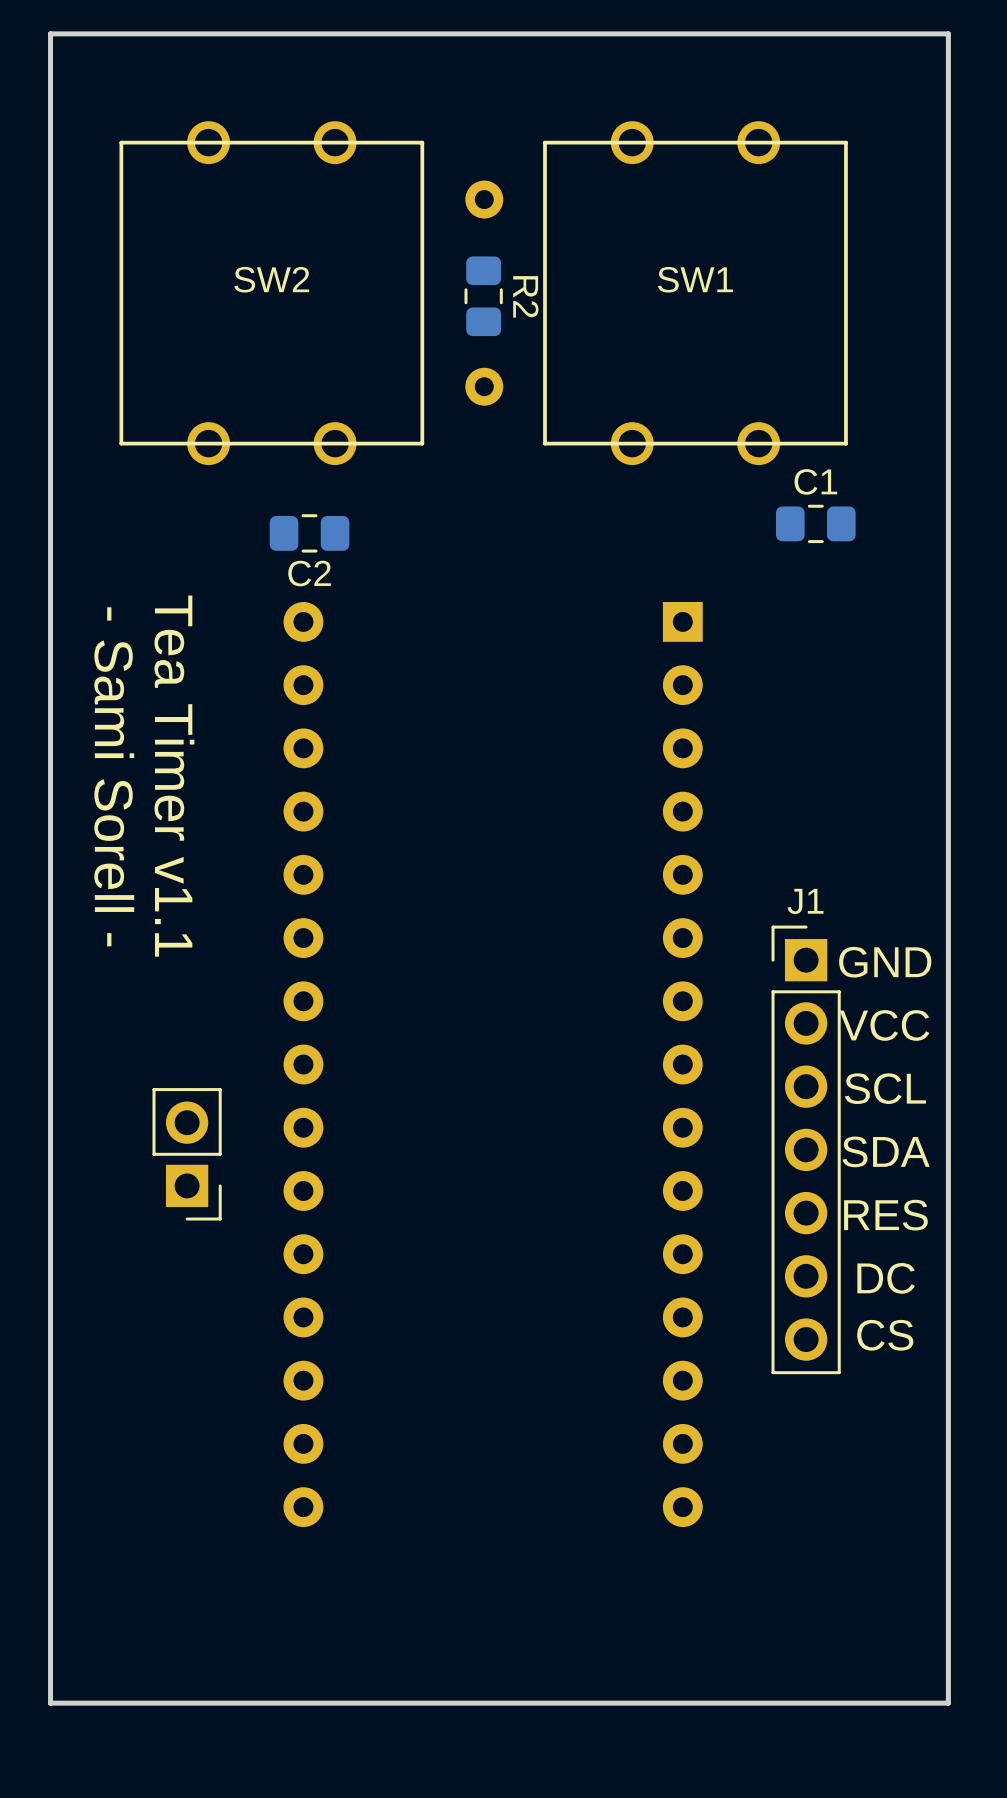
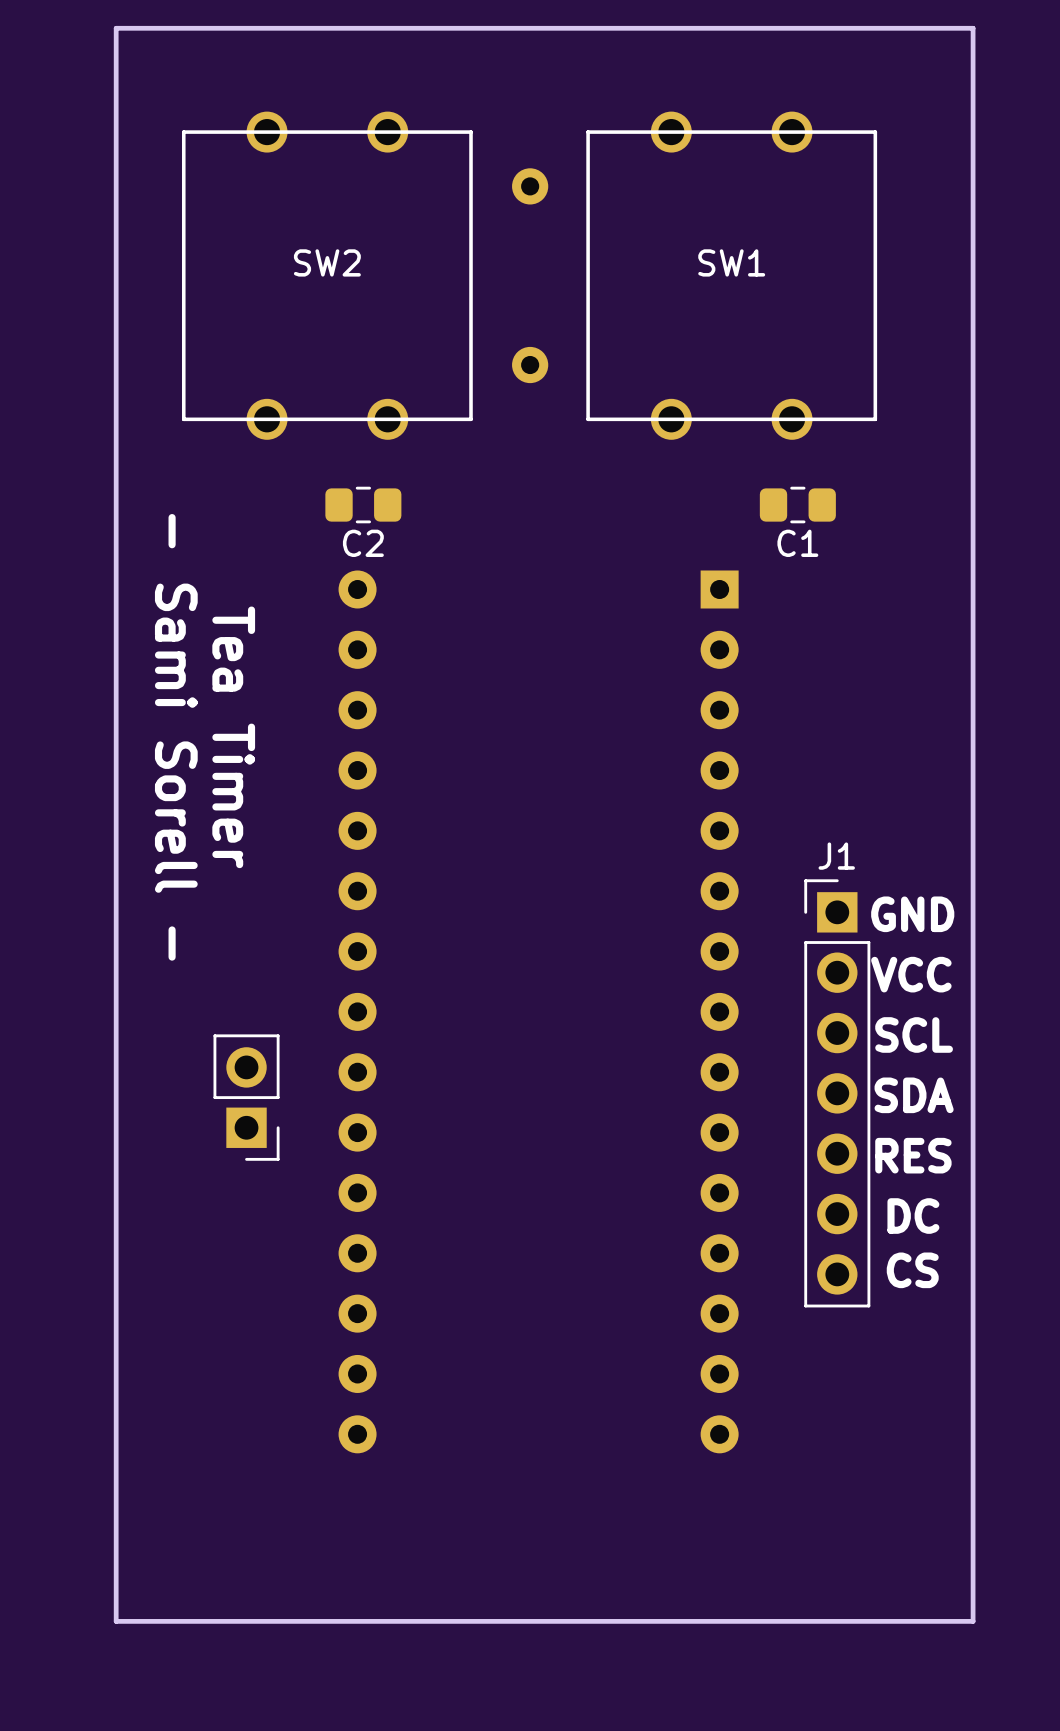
R2: (483, 296) -> none
C1 name position: C1 (815, 481) -> C1 (797, 543)
C1 position: (815, 523) -> (797, 505)
text: Tea Timer v1.1 (174, 776) -> Tea Timer (233, 737)

